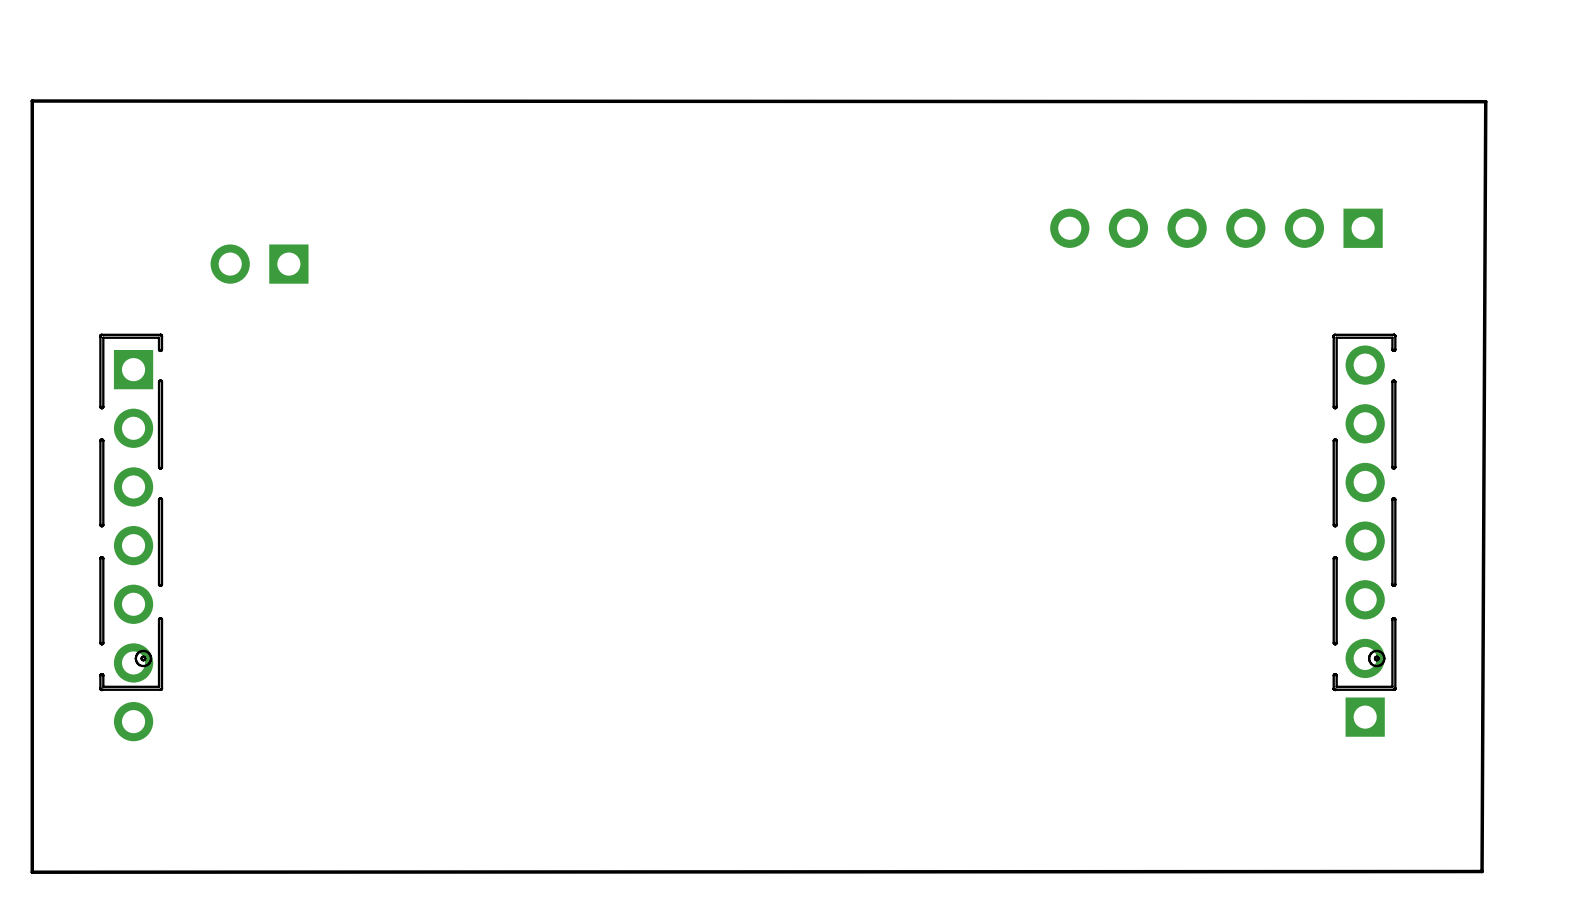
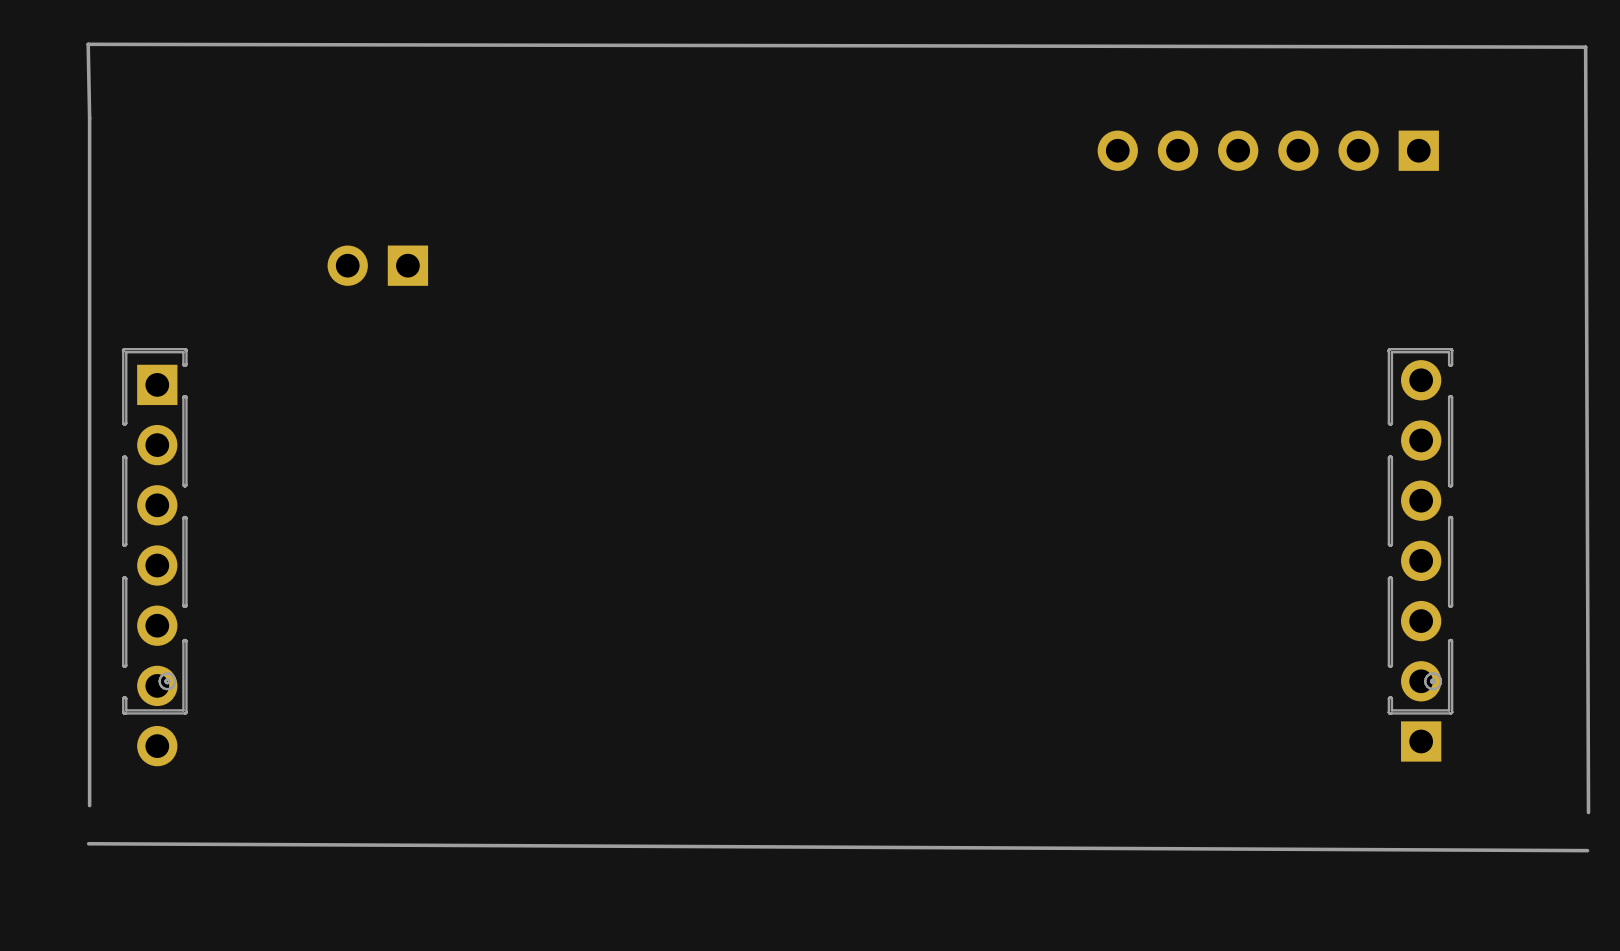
board edge: (32, 101) (32, 872) (1482, 871) (1485, 101) (32, 101) -> none
part position: (1216, 228) -> (1268, 150)
part position: (259, 264) -> (377, 265)
board edge: none -> (89, 805) (88, 44) (1585, 47) (1588, 812)
board edge: none -> (88, 843) (1587, 850)

